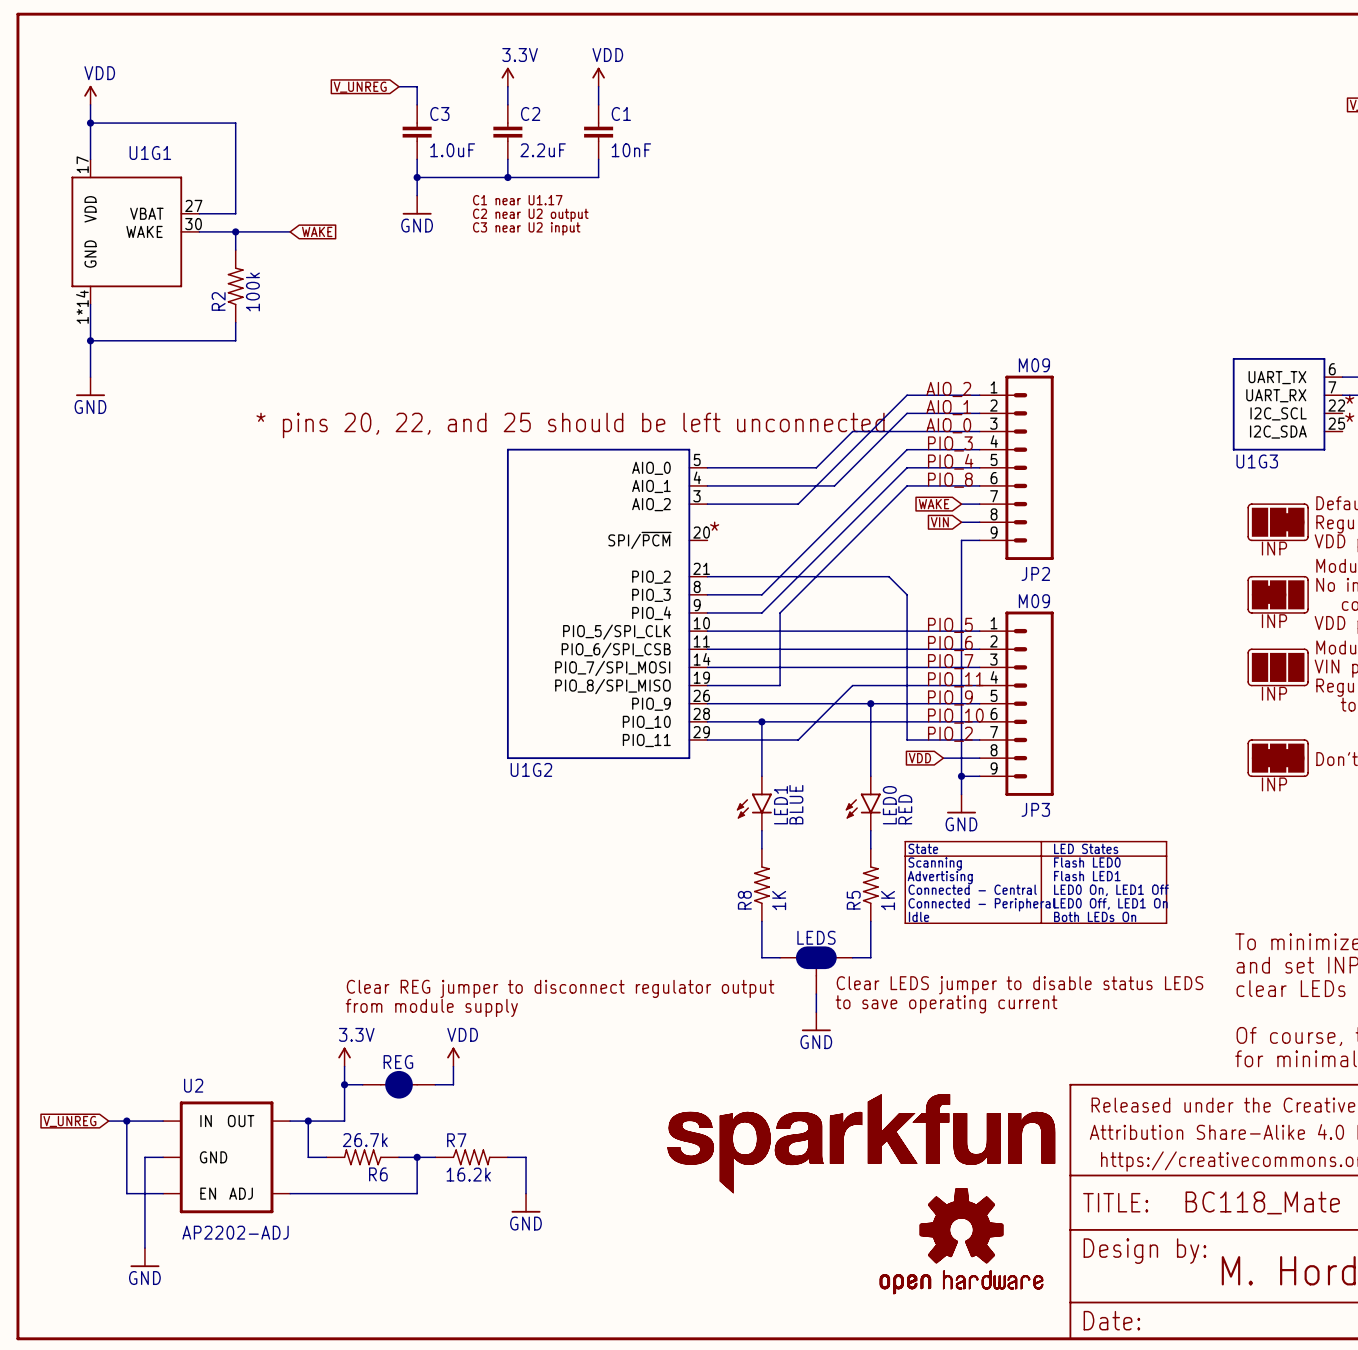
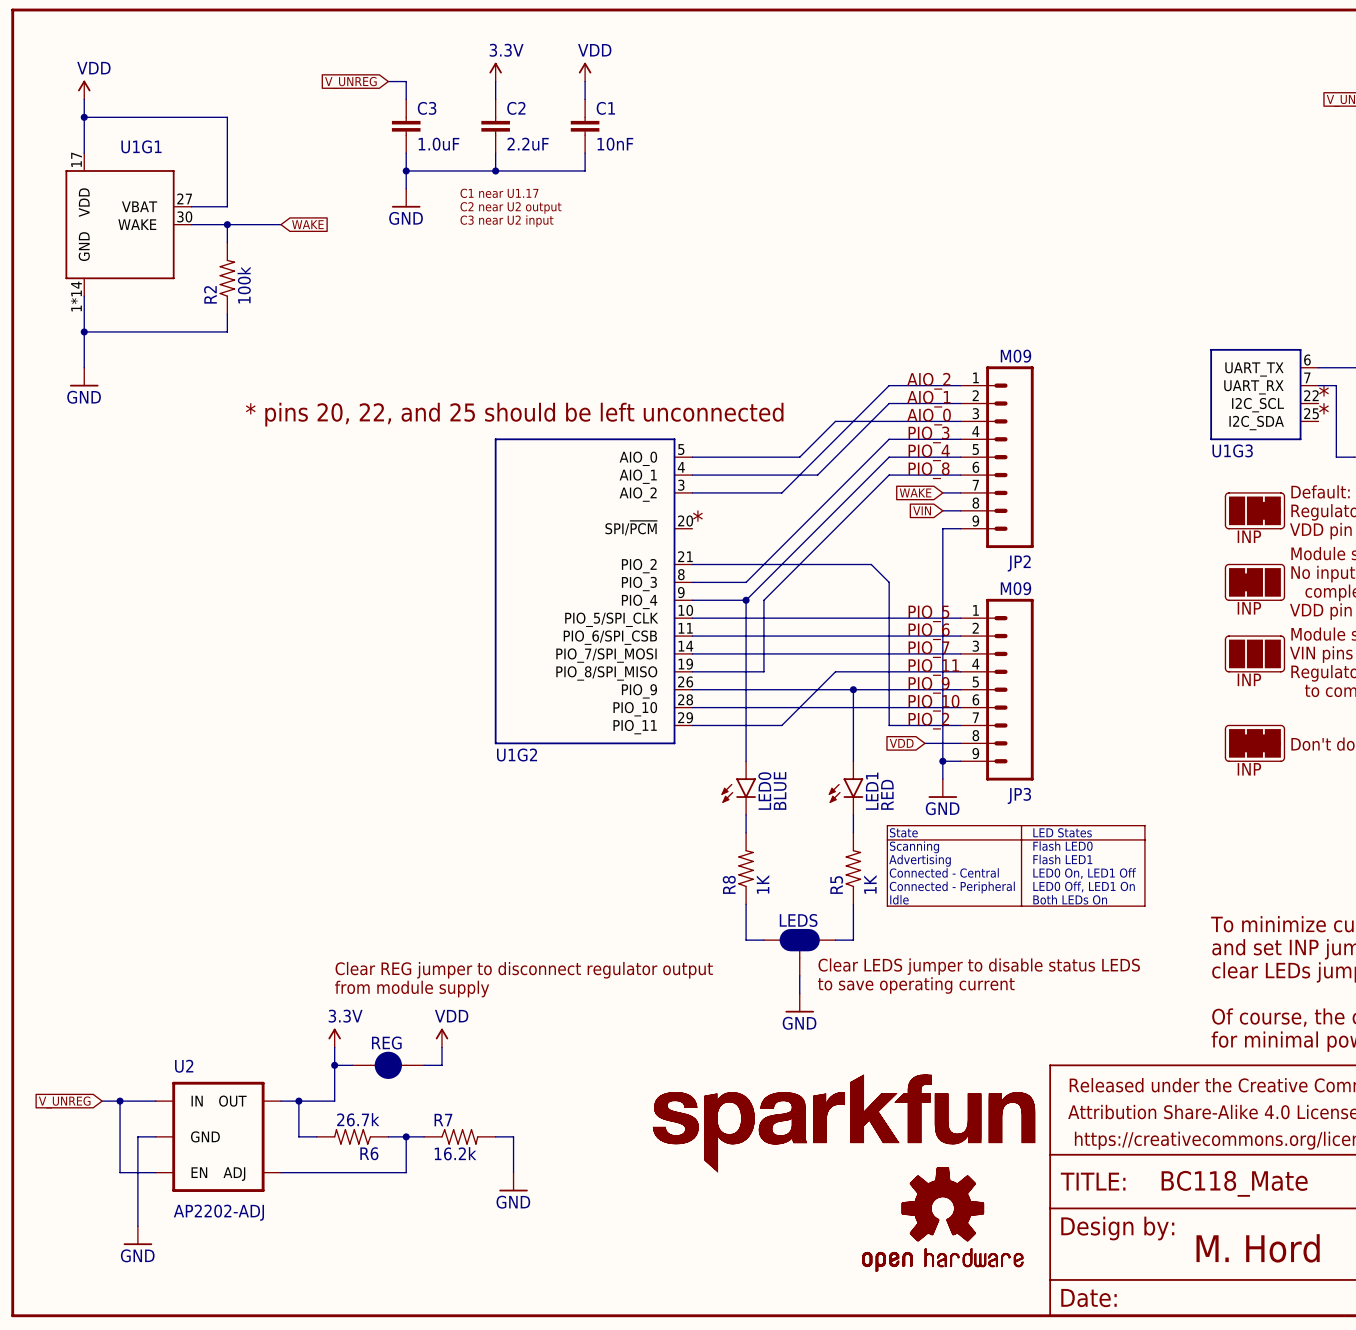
wire: none -> (746, 600) (746, 707)
junction: none -> (746, 600)
junction: (761, 721) -> none
LED1 name: LED1 (780, 805) -> LED0 (764, 791)
LED0 name: LED0 (889, 805) -> LED1 (872, 791)

